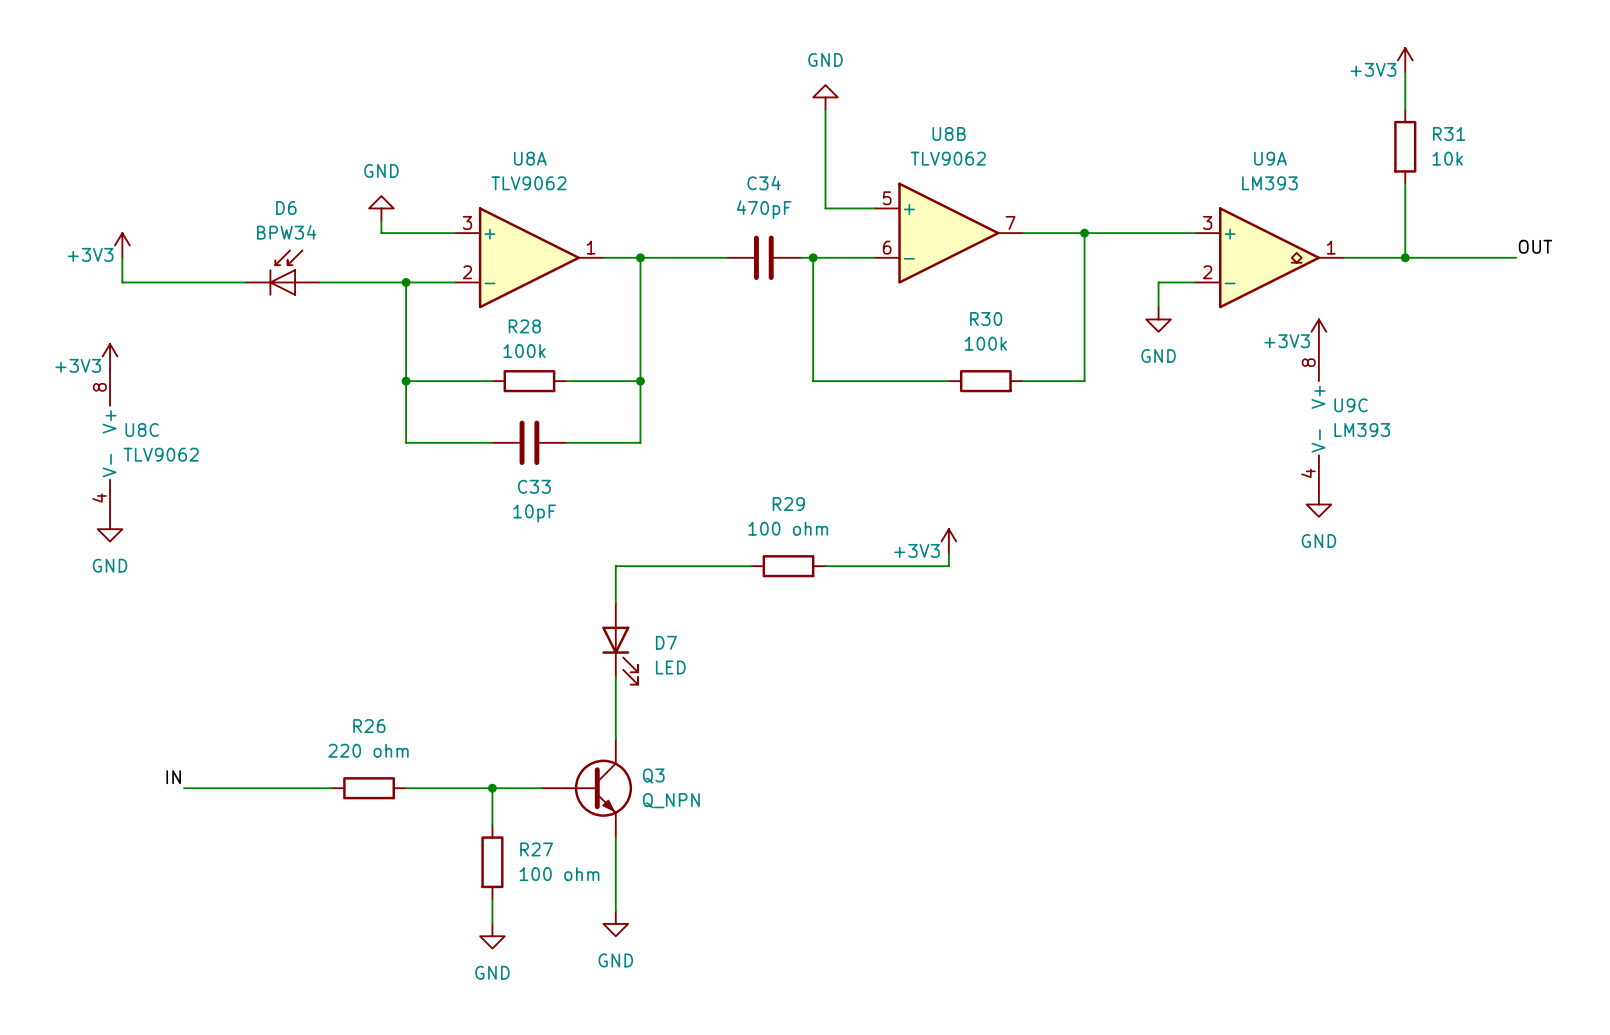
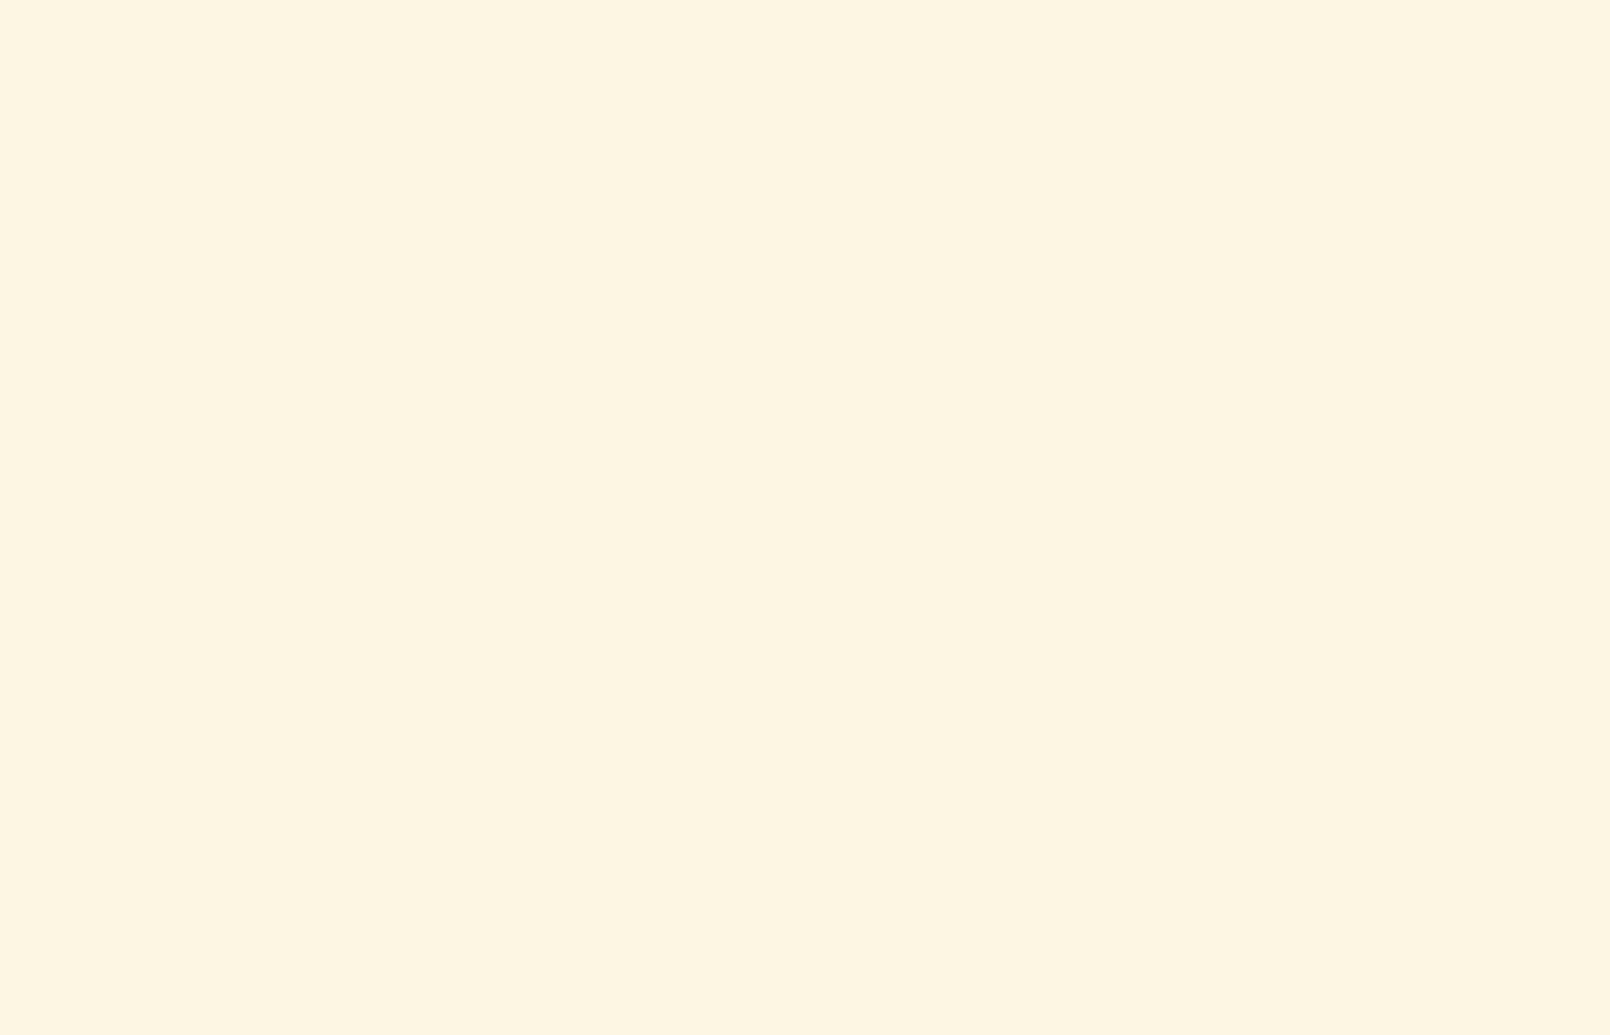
power symbol: +3V3 (1405, 60) -> none
wire: (1405, 72) (1405, 109) -> none
power symbol: GND (825, 97) -> none
wire: (825, 109) (825, 208) (874, 208) -> none
R31: 10k (1405, 146) -> none
wire: (1405, 183) (1405, 257) -> none
power symbol: GND (381, 208) -> none
wire: (381, 220) (381, 233) (455, 233) -> none
U8B: TLV9062 (948, 233) -> none
wire: (1022, 233) (1195, 233) -> none
wire: (1084, 233) (1084, 381) (1022, 381) -> none
junction: (1084, 233) -> none
power symbol: +3V3 (122, 245) -> none
label: OUT (1535, 246) -> none
wire: (122, 257) (122, 282) (245, 282) -> none
U8A: TLV9062 (529, 257) -> none
wire: (603, 257) (726, 257) -> none
wire: (640, 257) (640, 442) (566, 442) -> none
junction: (640, 257) -> none
C34: 470pF (763, 257) -> none
wire: (800, 257) (874, 257) -> none
wire: (813, 257) (813, 381) (948, 381) -> none
junction: (813, 257) -> none
U9A: LM393 (1269, 257) -> none
wire: (1343, 257) (1516, 257) -> none
junction: (1405, 257) -> none
D6: BPW34 (282, 272) -> none
wire: (319, 282) (455, 282) -> none
wire: (406, 282) (406, 442) (492, 442) -> none
junction: (406, 282) -> none
wire: (1195, 282) (1158, 282) (1158, 307) -> none
power symbol: GND (1158, 319) -> none
power symbol: +3V3 (1318, 331) -> none
power symbol: +3V3 (110, 356) -> none
wire: (406, 381) (492, 381) -> none
junction: (406, 381) -> none
R28: 100k (529, 381) -> none
wire: (566, 381) (640, 381) -> none
junction: (640, 381) -> none
R30: 100k (985, 381) -> none
U9C: LM393 (1318, 418) -> none
U8C: TLV9062 (110, 442) -> none
C33: 10pF (529, 442) -> none
power symbol: GND (1318, 504) -> none
power symbol: GND (110, 529) -> none
power symbol: +3V3 (948, 541) -> none
wire: (948, 553) (948, 566) (825, 566) -> none
wire: (751, 566) (615, 566) (615, 603) -> none
R29: 100 ohm (788, 566) -> none
D7: LED (620, 643) -> none
wire: (615, 677) (615, 738) -> none
label: IN (173, 777) -> none
wire: (184, 788) (332, 788) -> none
R26: 220 ohm (369, 788) -> none
wire: (406, 788) (541, 788) -> none
wire: (492, 788) (492, 825) -> none
junction: (492, 788) -> none
Q3: Q_NPN (586, 788) -> none
wire: (615, 837) (615, 911) -> none
R27: 100 ohm (492, 862) -> none
wire: (492, 899) (492, 923) -> none
power symbol: GND (615, 923) -> none
power symbol: GND (492, 936) -> none

